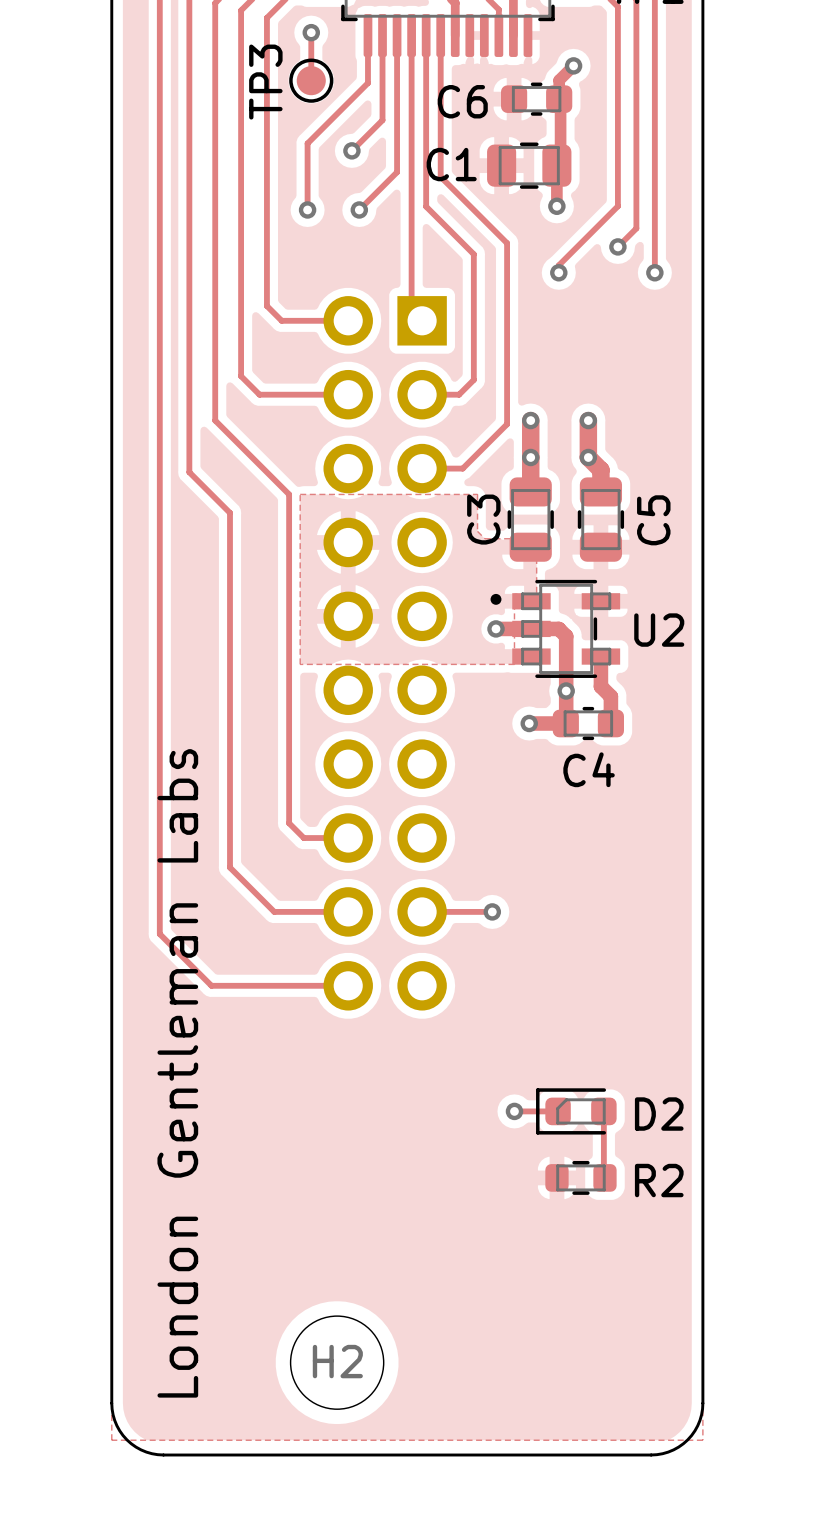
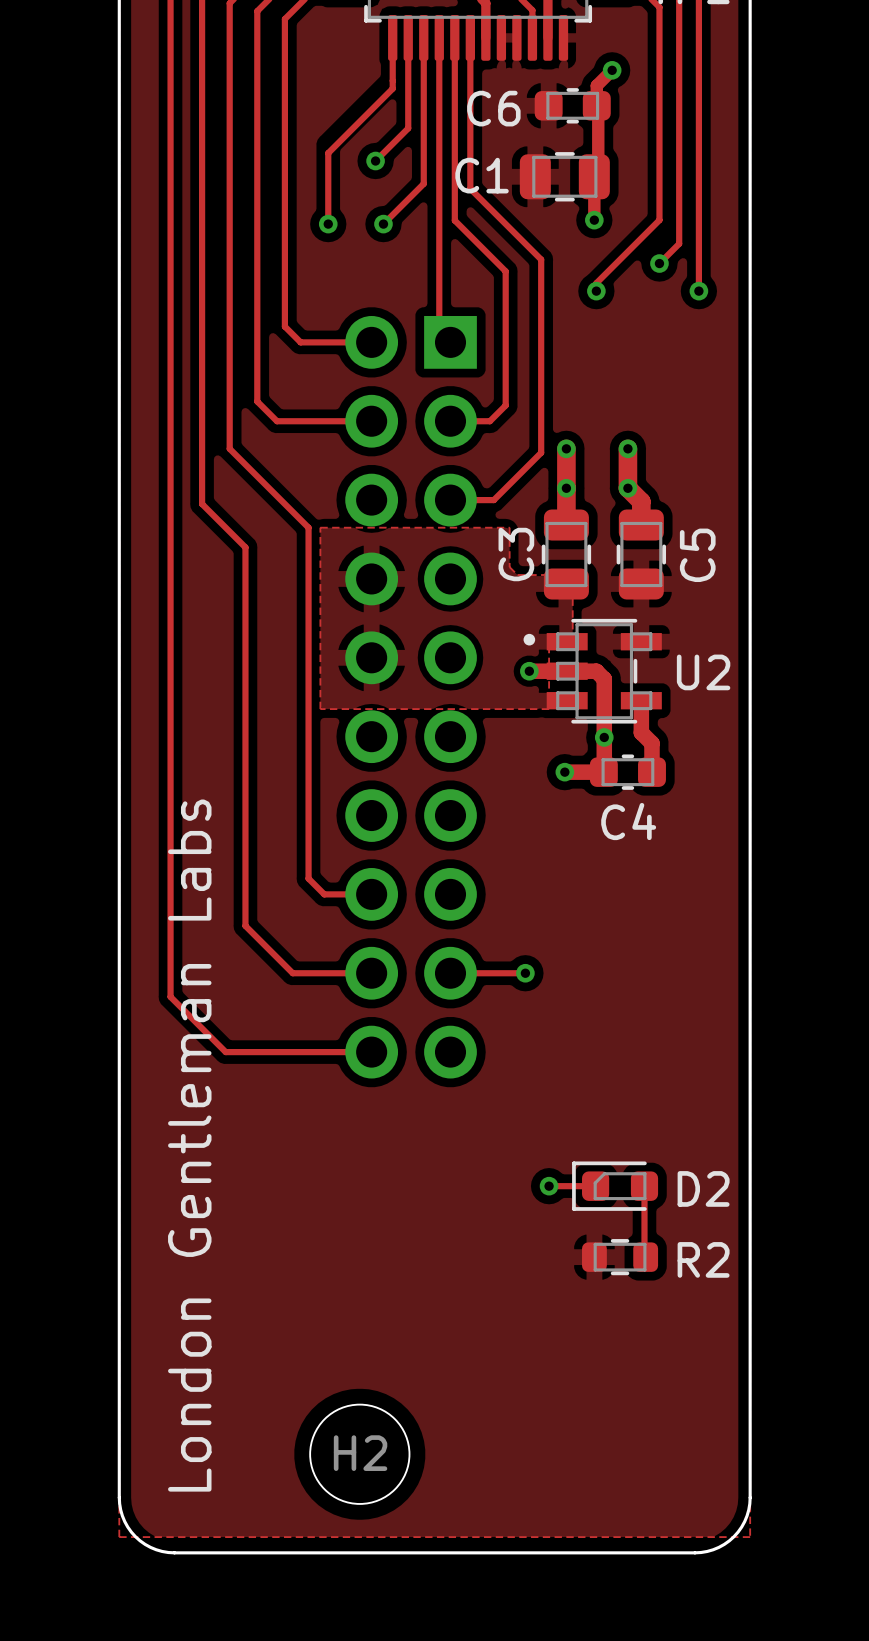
track: (311, 32) (311, 80) -> none
via: (311, 32) -> none
TP3: (311, 80) -> none

